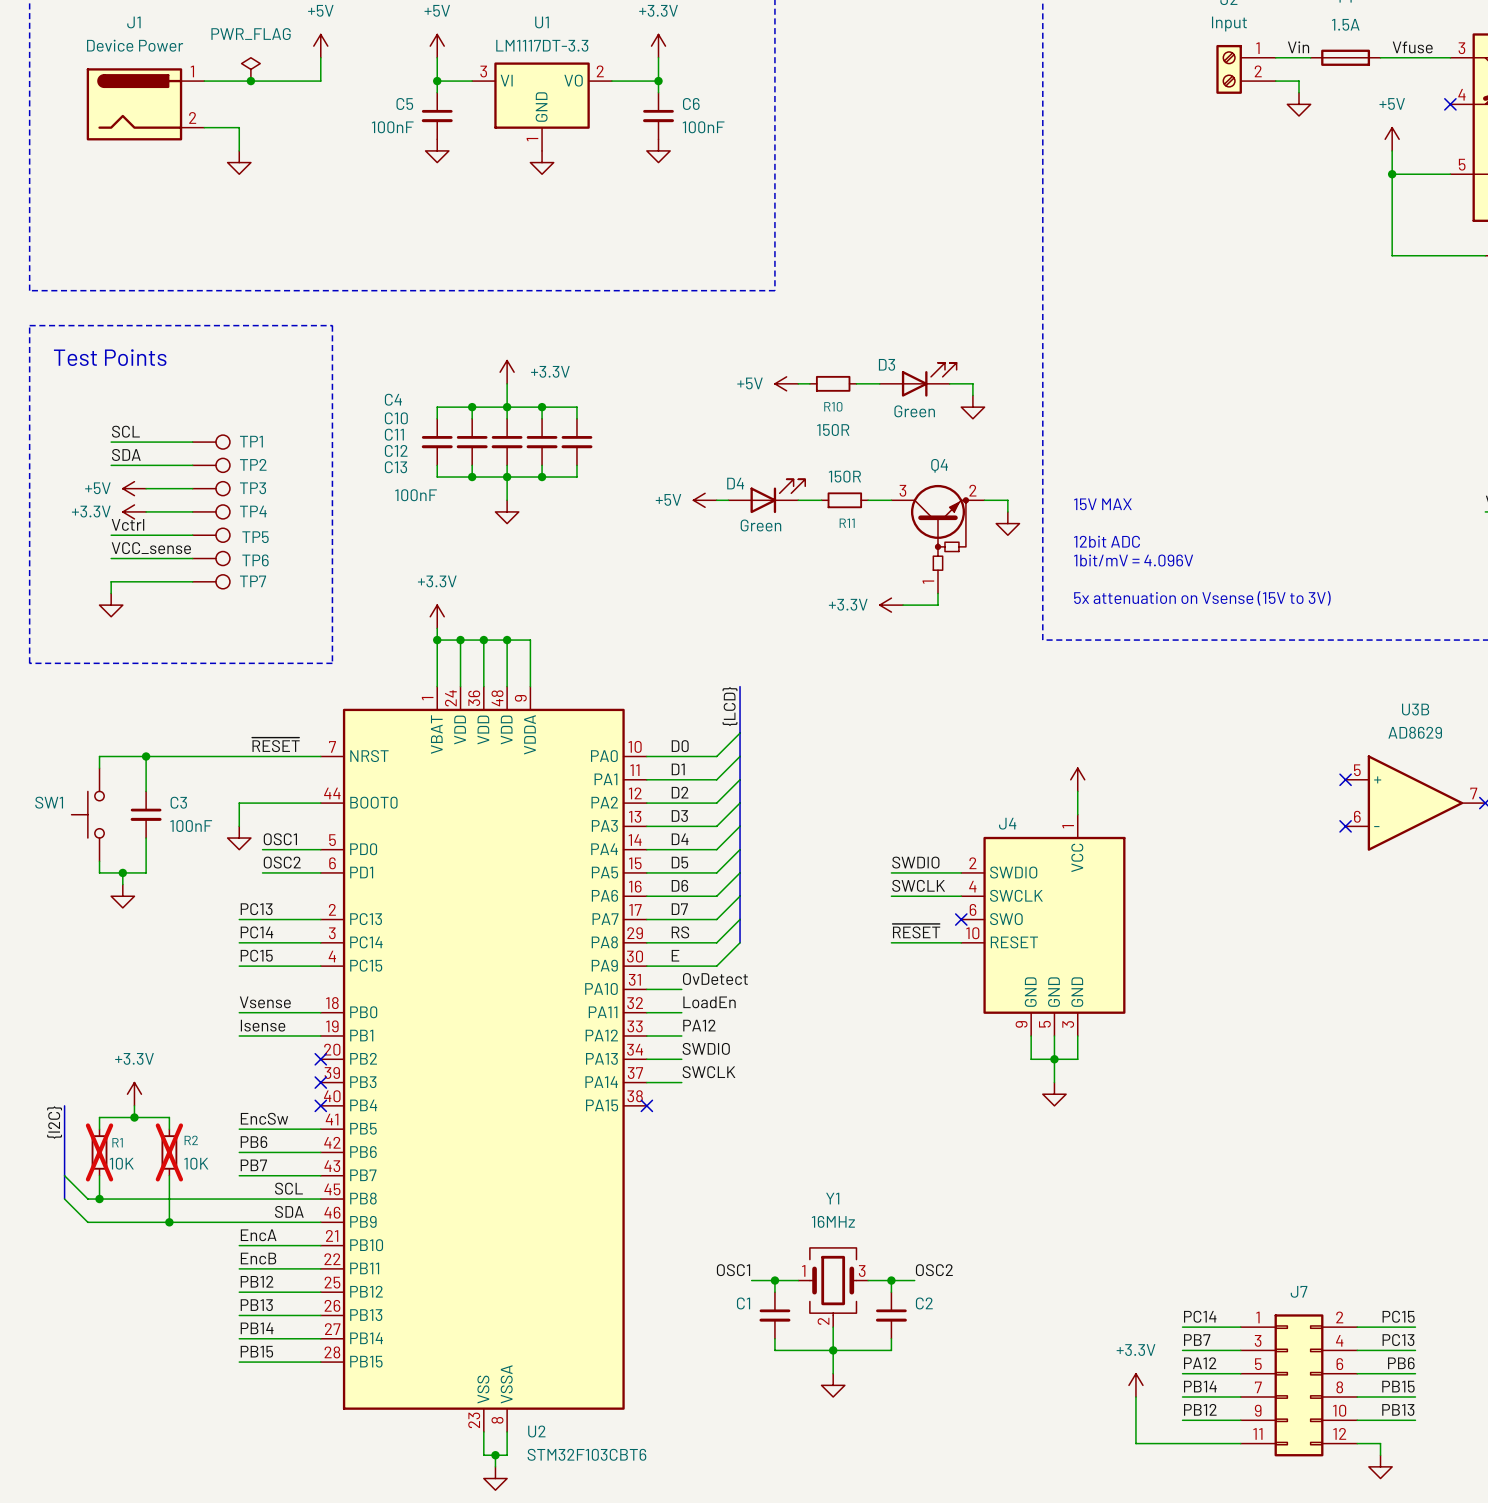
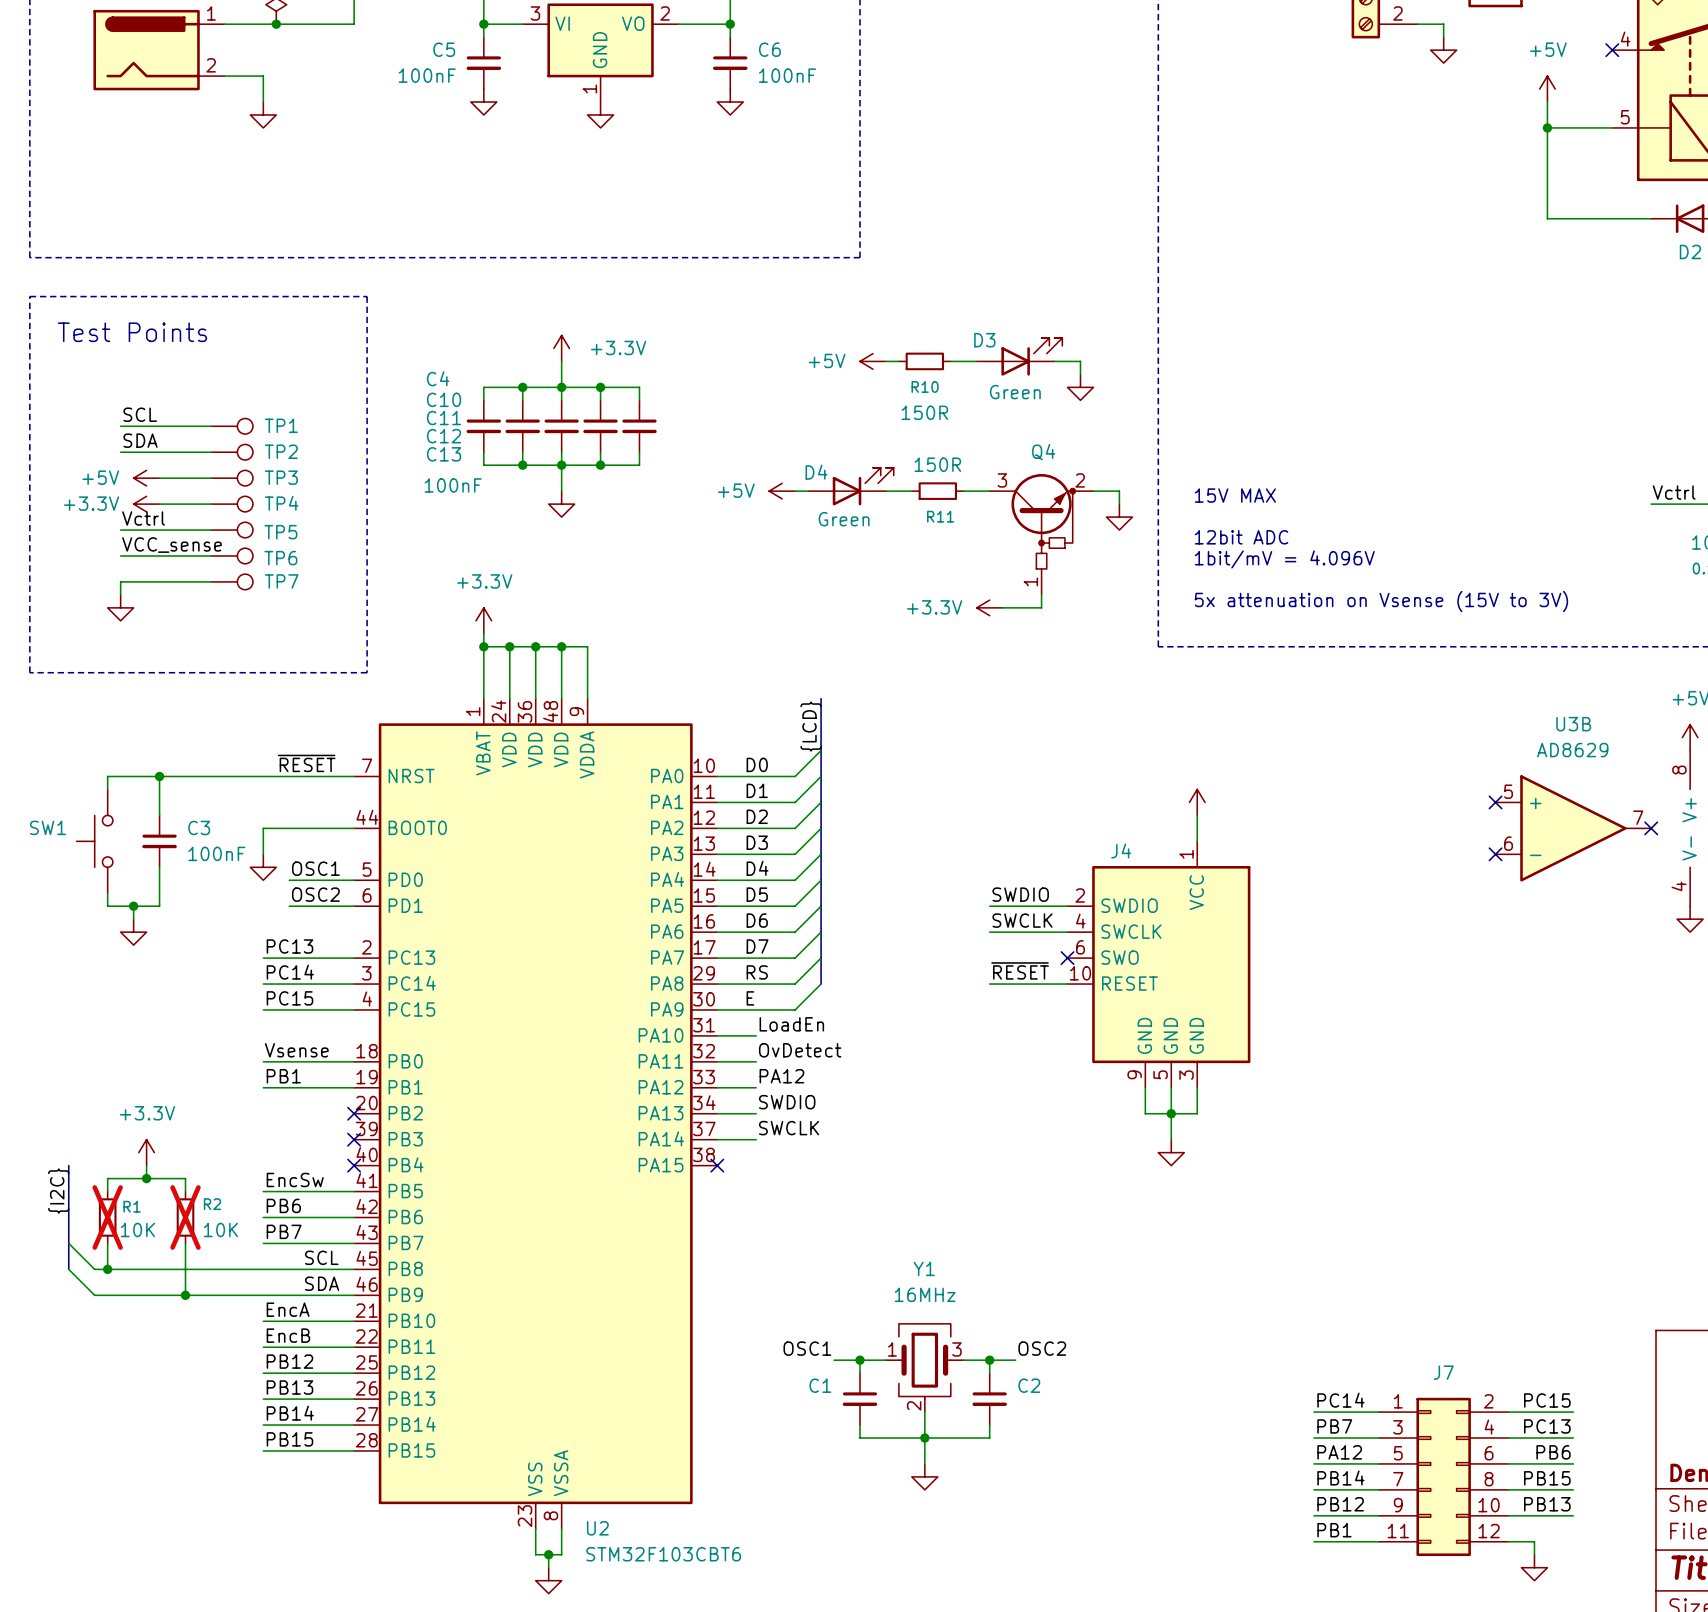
label: OvDetect (715, 979) -> LoadEn (791, 1024)
label: LoadEn (709, 1002) -> OvDetect (800, 1050)
label: Isense (263, 1025) -> PB1 (283, 1076)
power symbol: +3.3V (1135, 1385) -> none
wire: (1135, 1397) (1135, 1443) (1182, 1443) -> none
label: none -> PB1 (1334, 1530)

